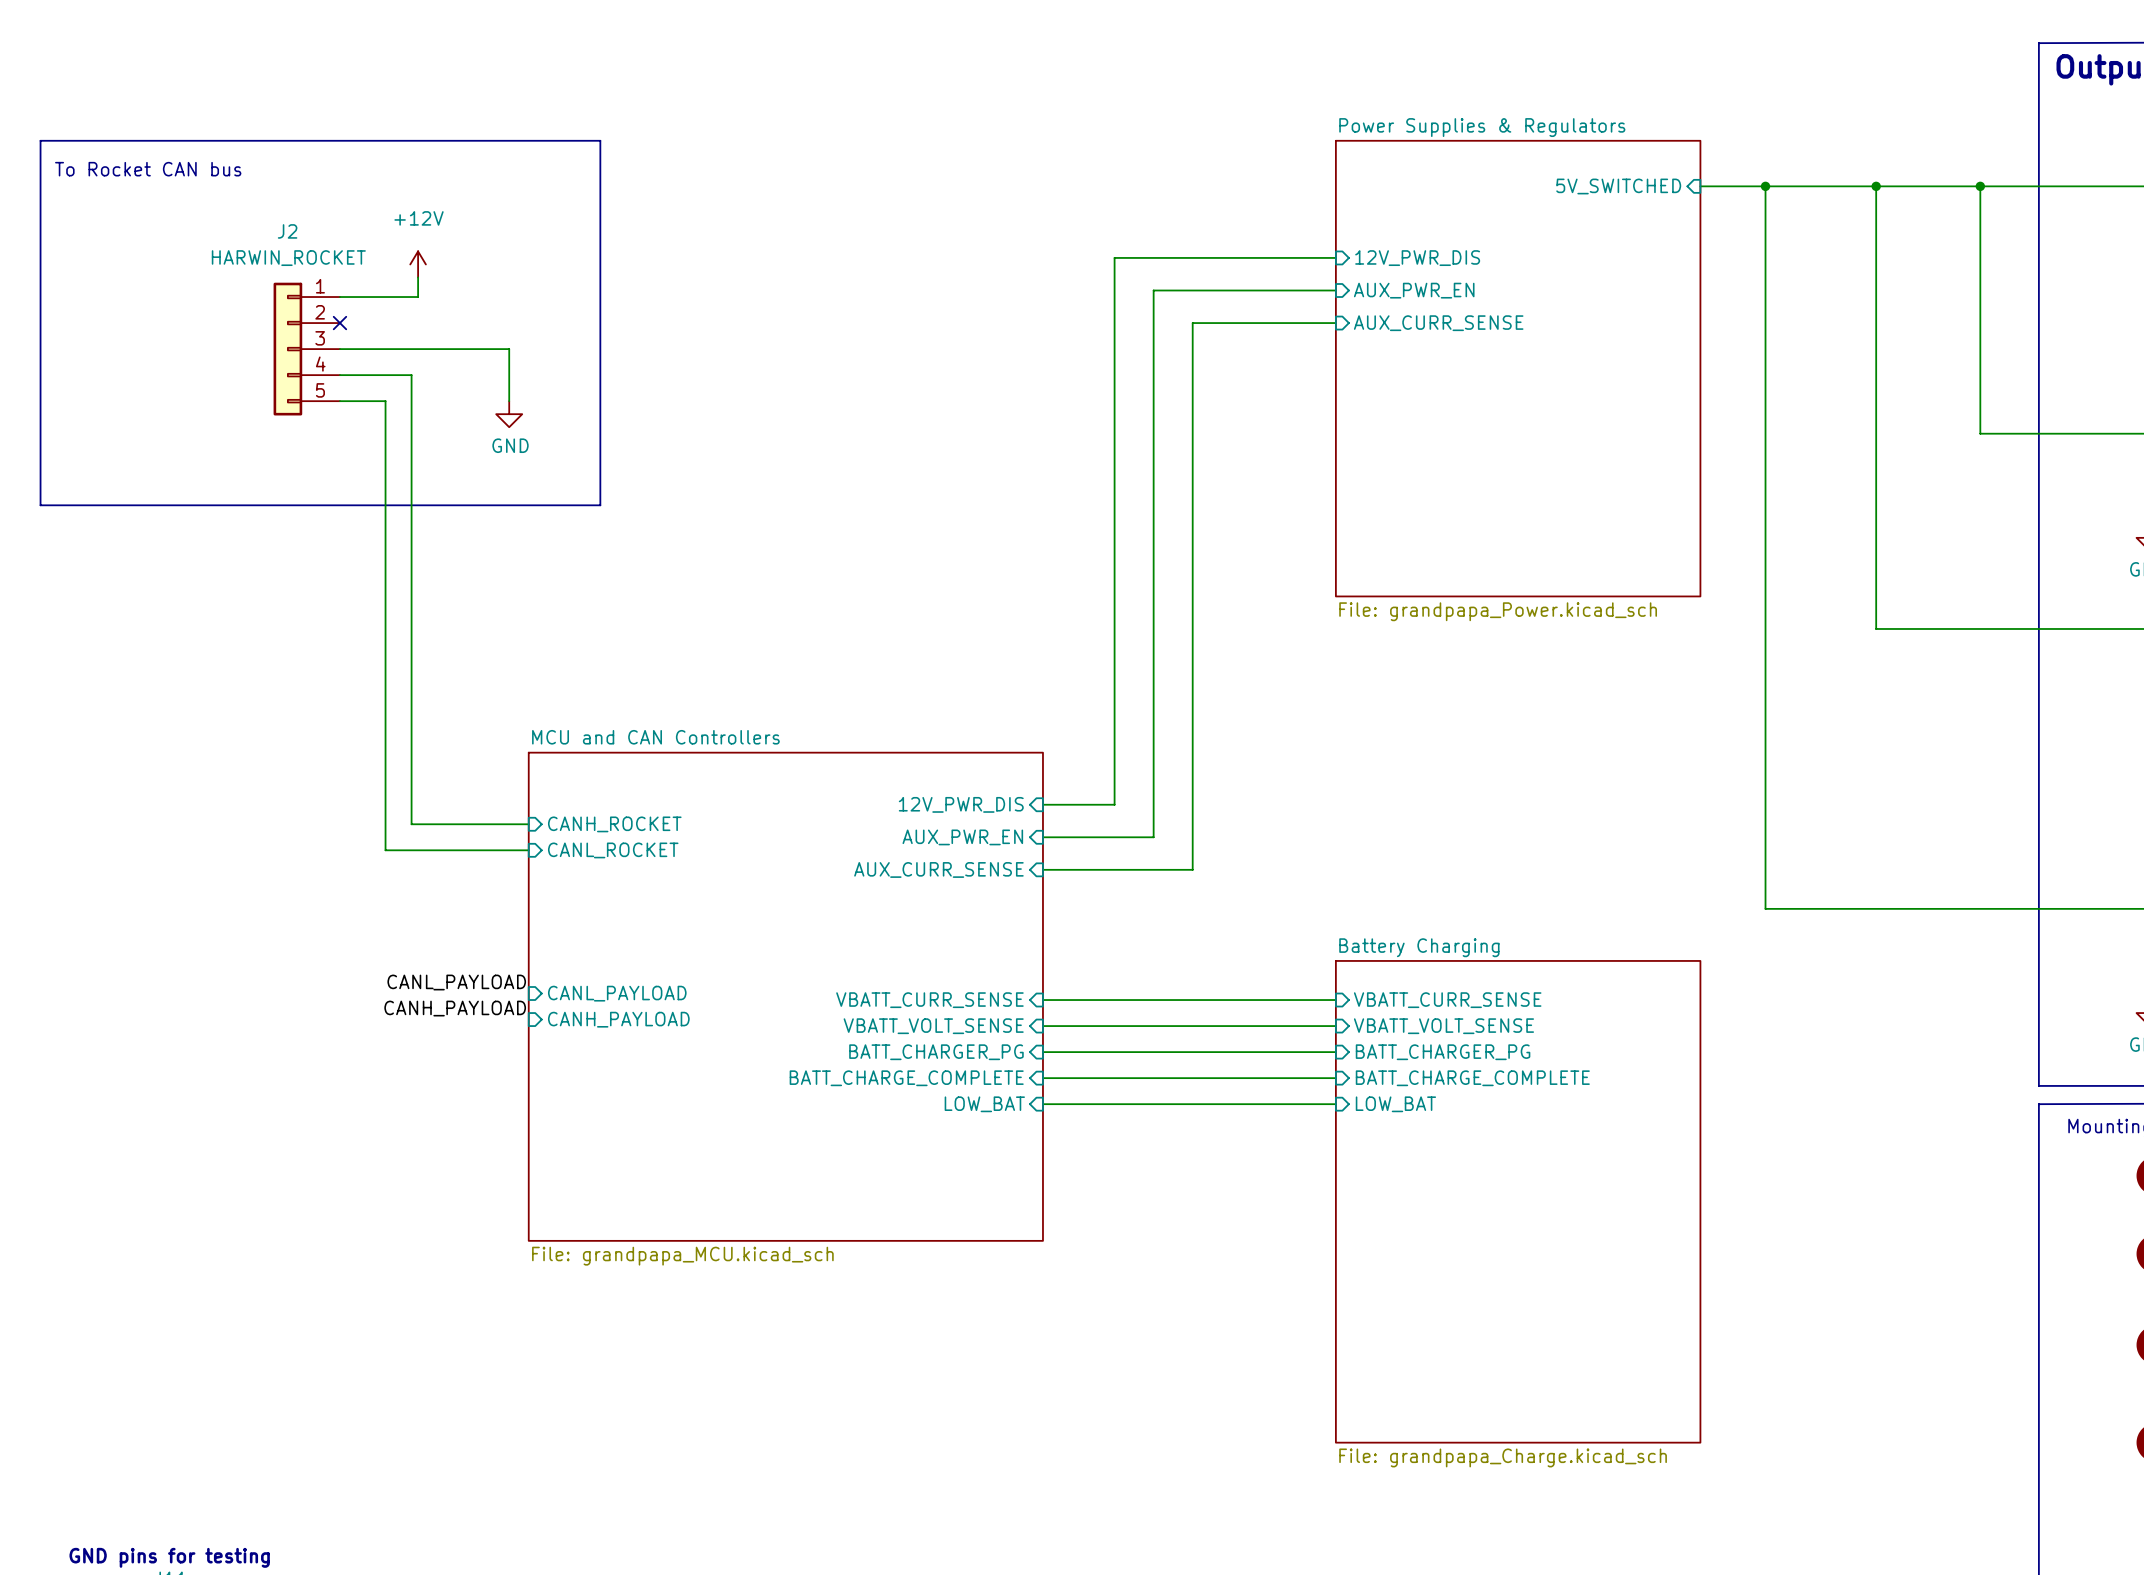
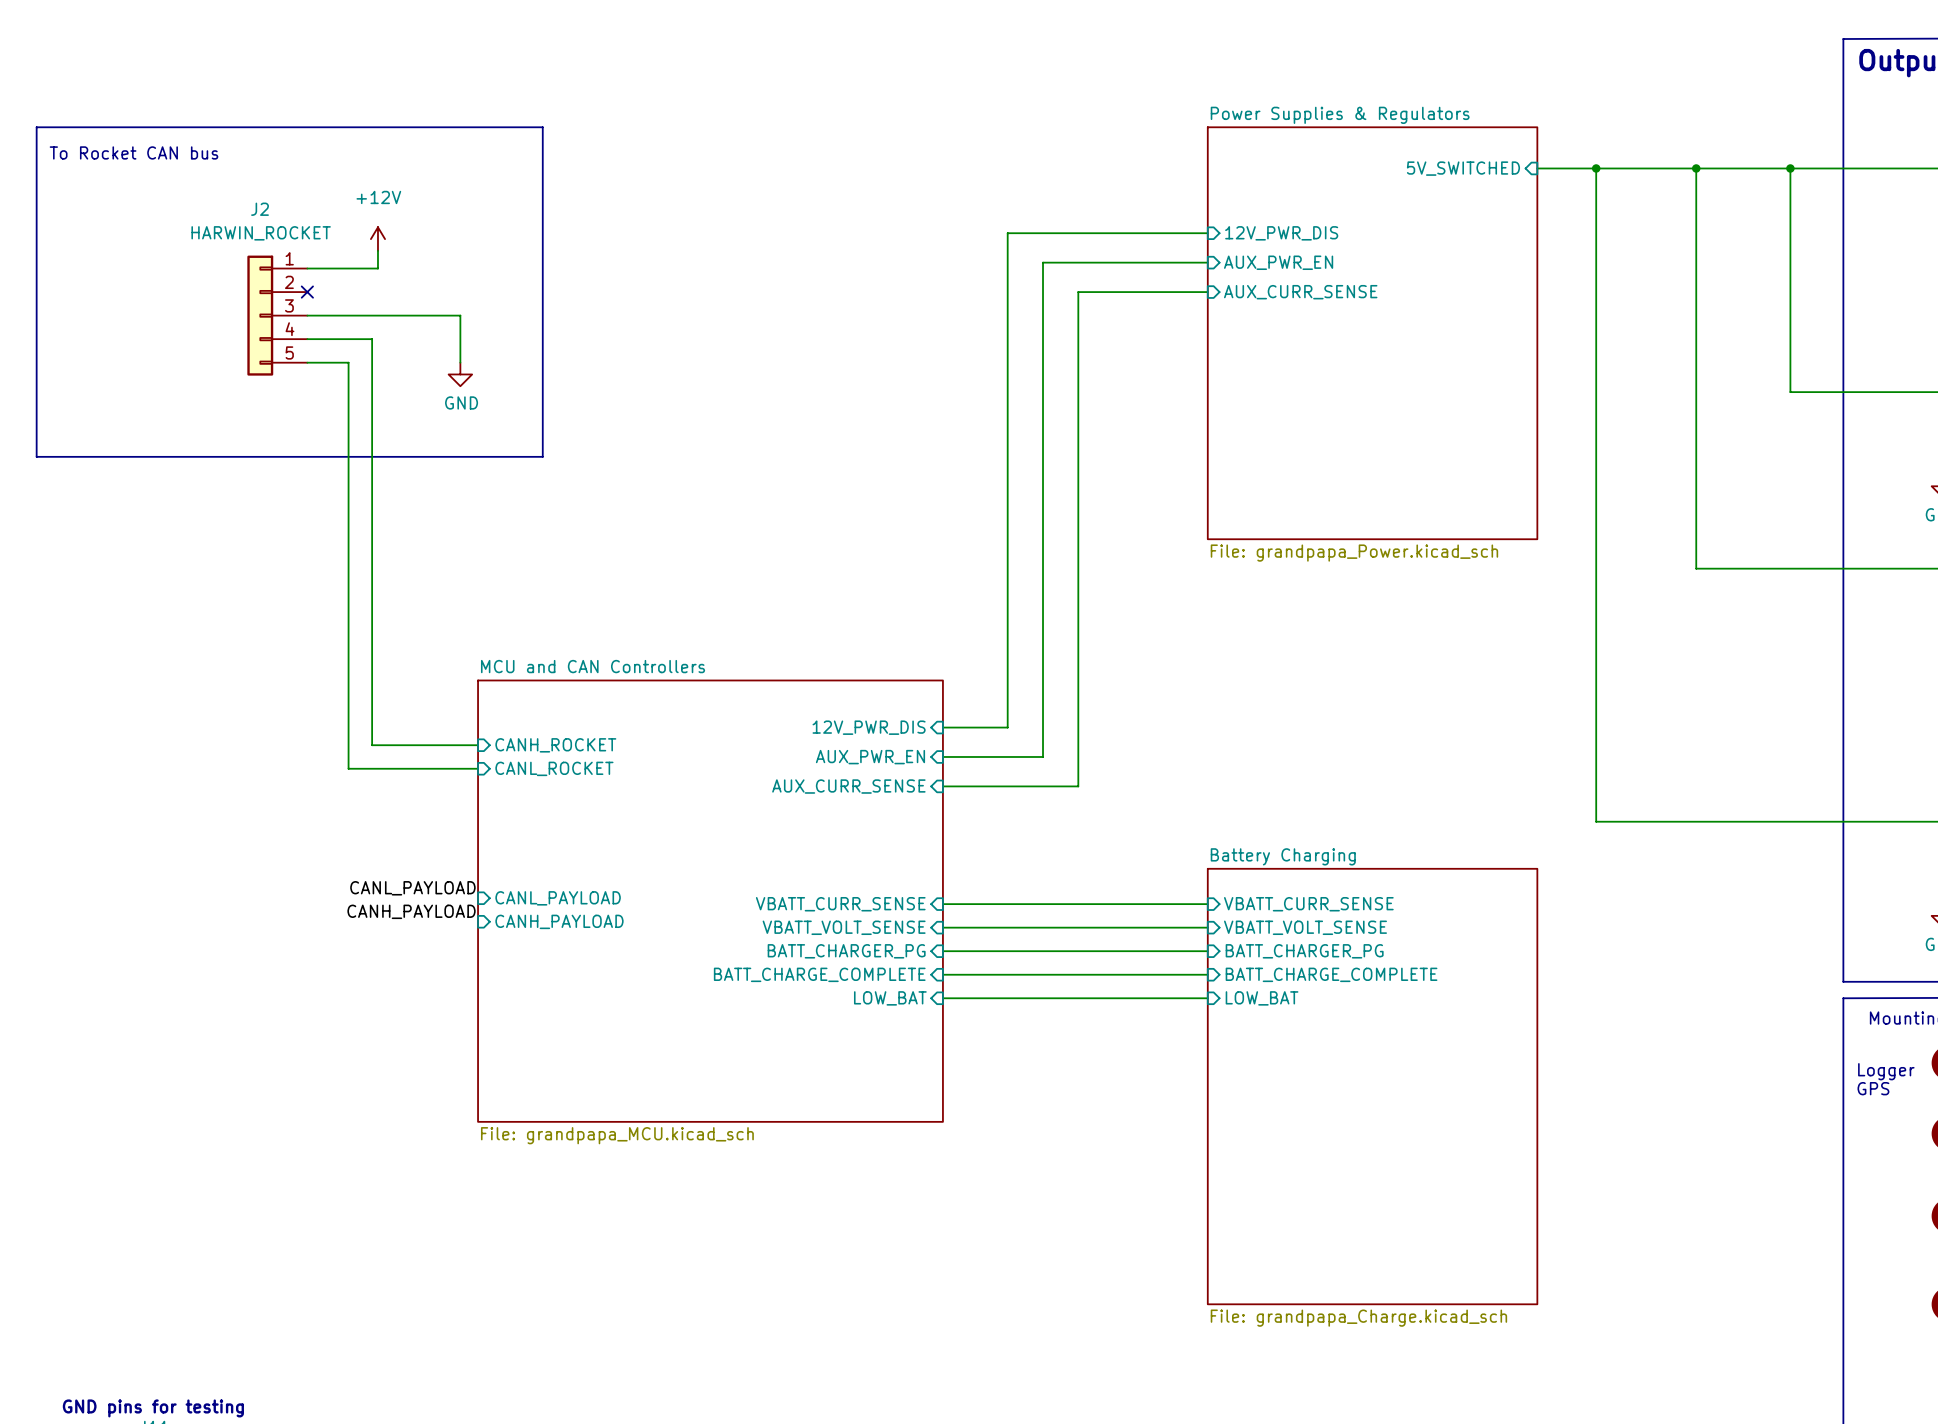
text: none -> Logger (1886, 1071)
text: none -> GPS (1873, 1088)

